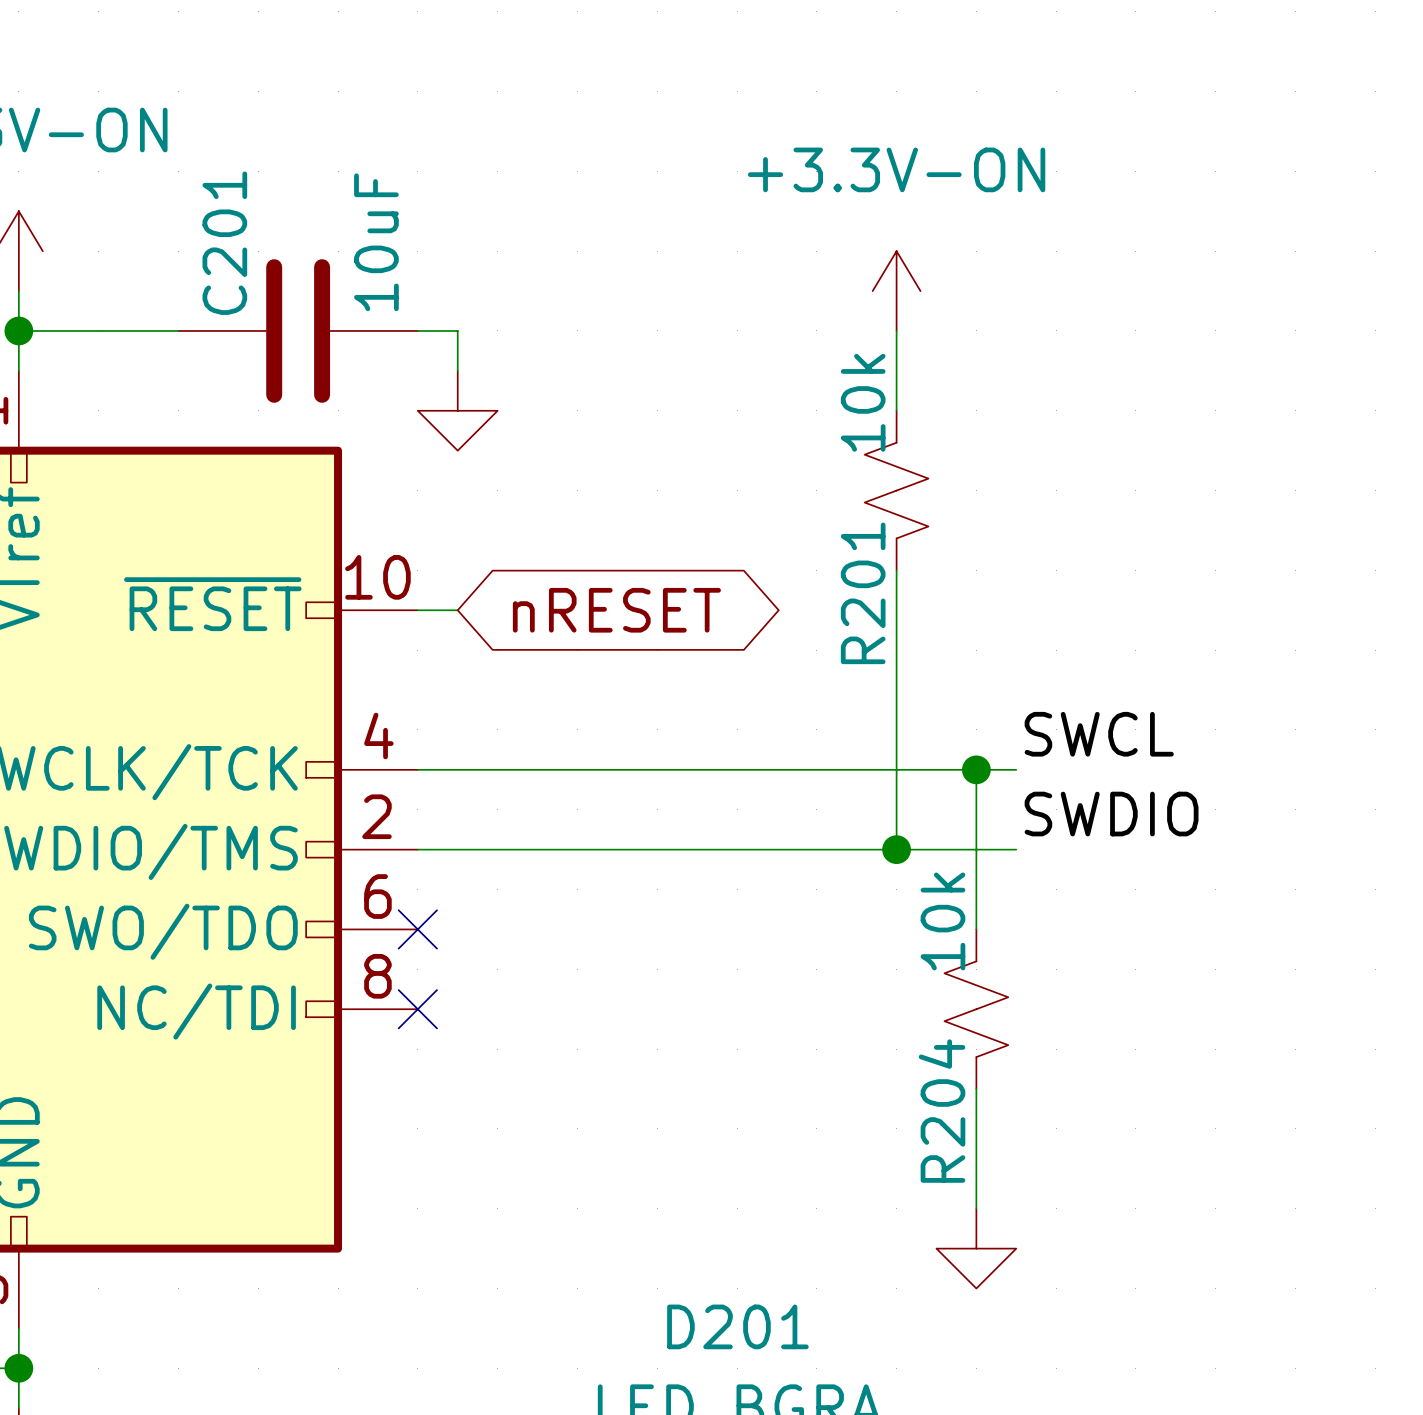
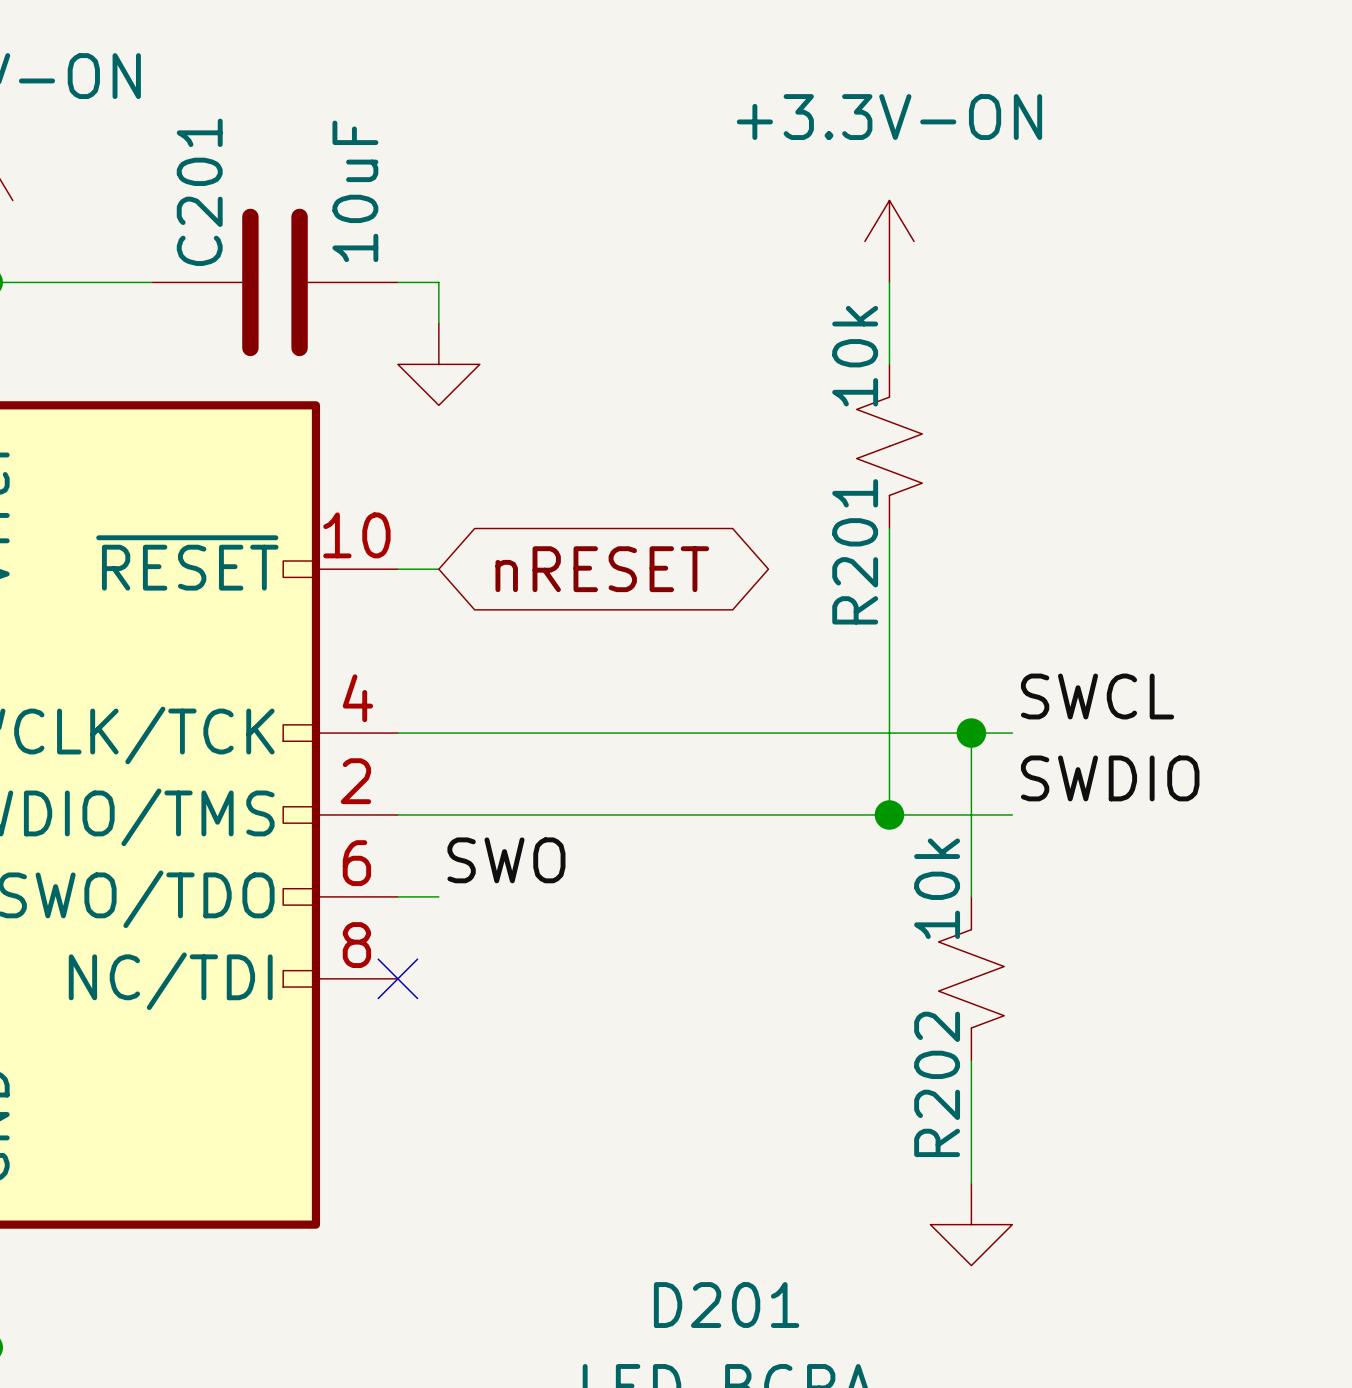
label: none -> SWO (506, 860)
wire: none -> (397, 896) (438, 896)
no-connect mark: (417, 929) -> none
R204 name: R204 (942, 1111) -> R202 (937, 1084)

